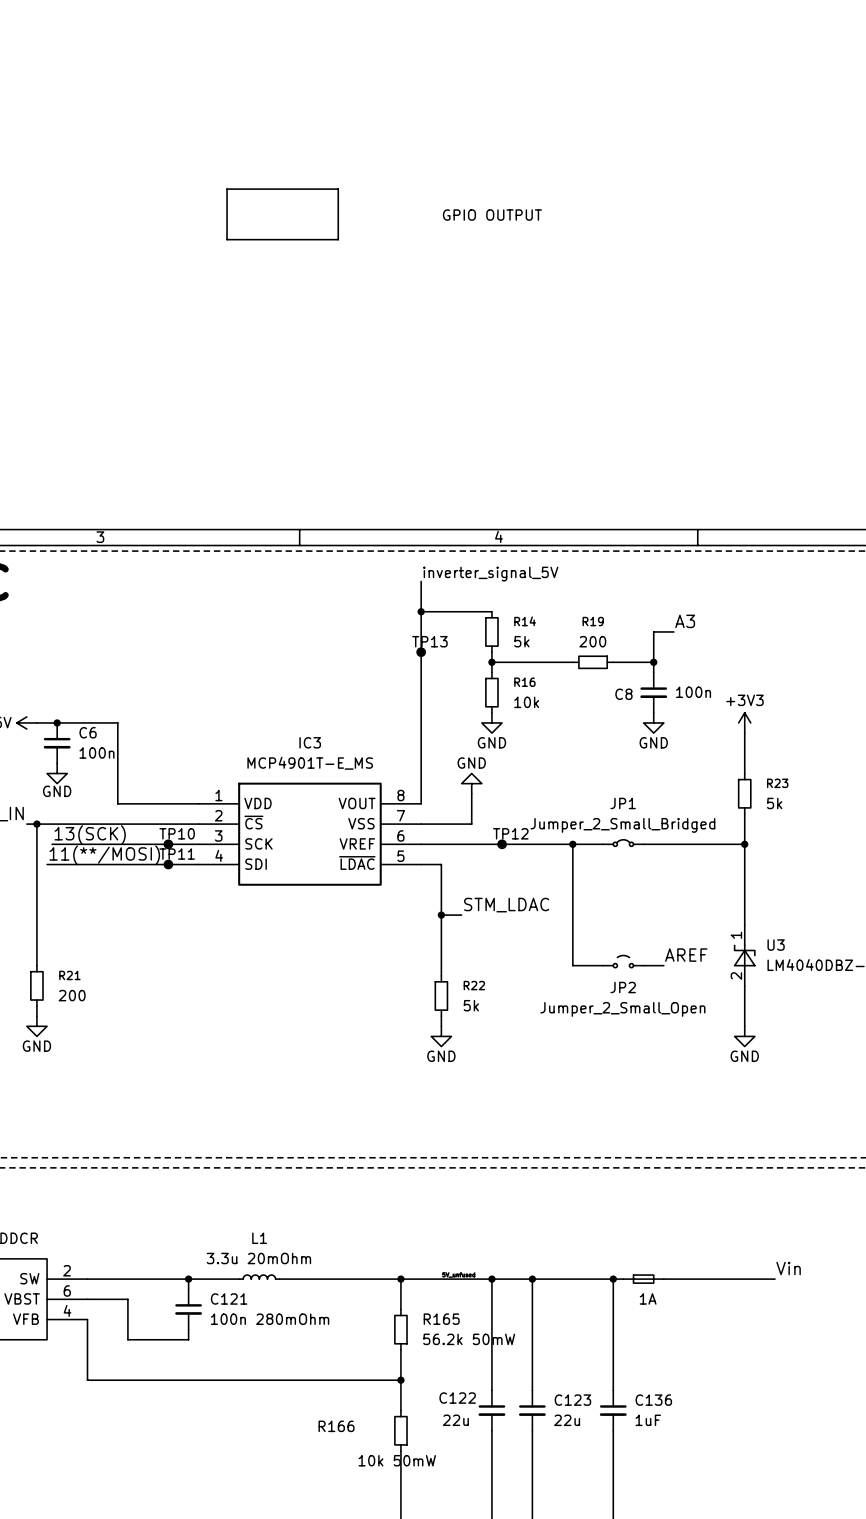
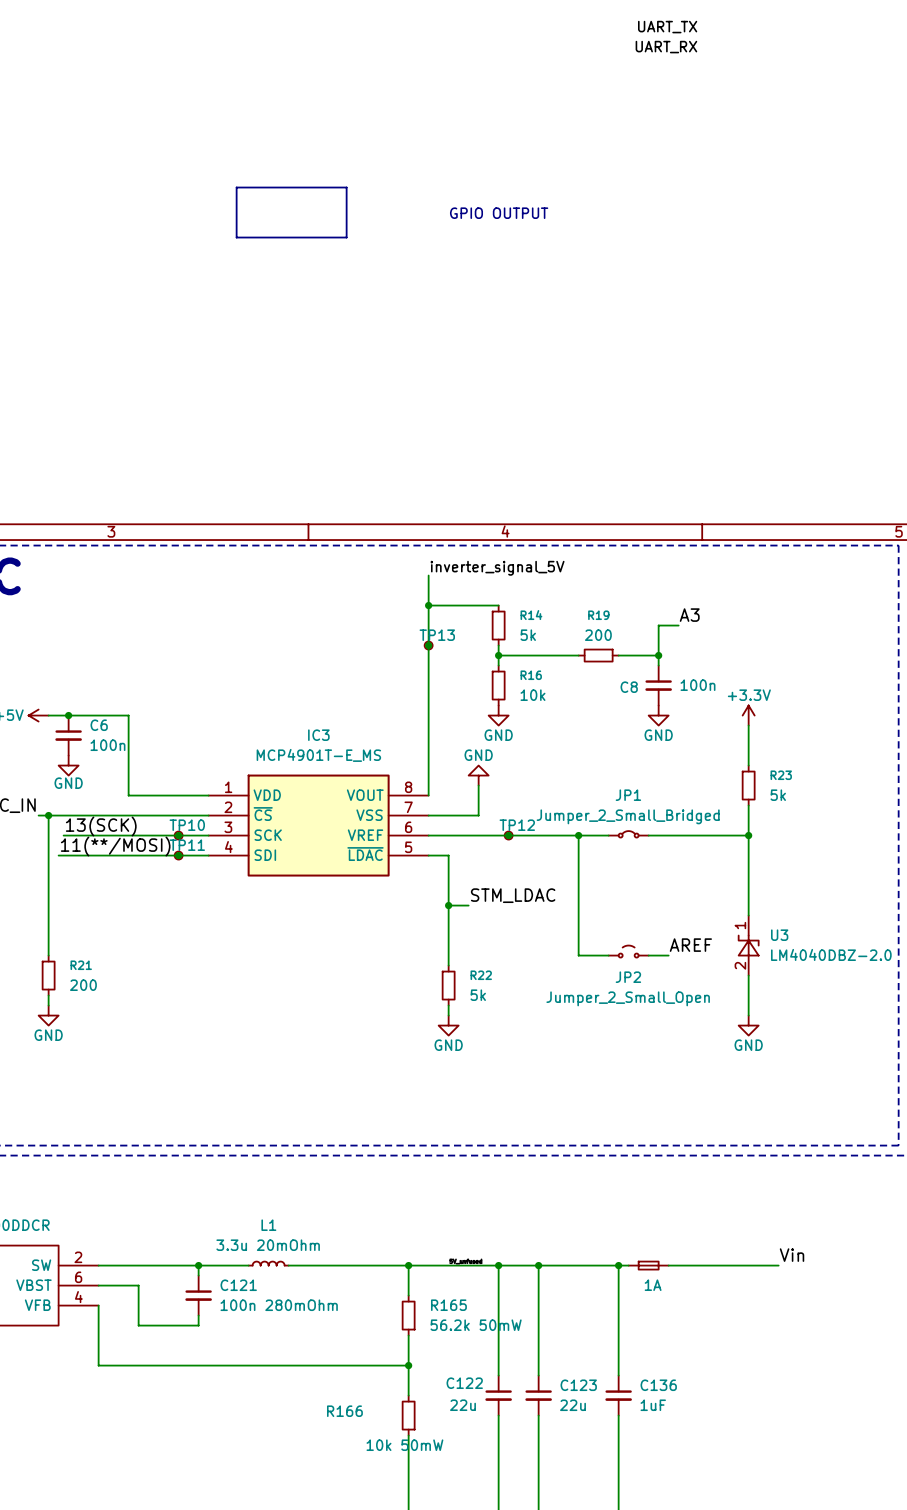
label: none -> UART_TX (667, 27)
label: none -> UART_RX (666, 47)
power symbol: +3V3 (744, 722) -> +3.3V (748, 715)

